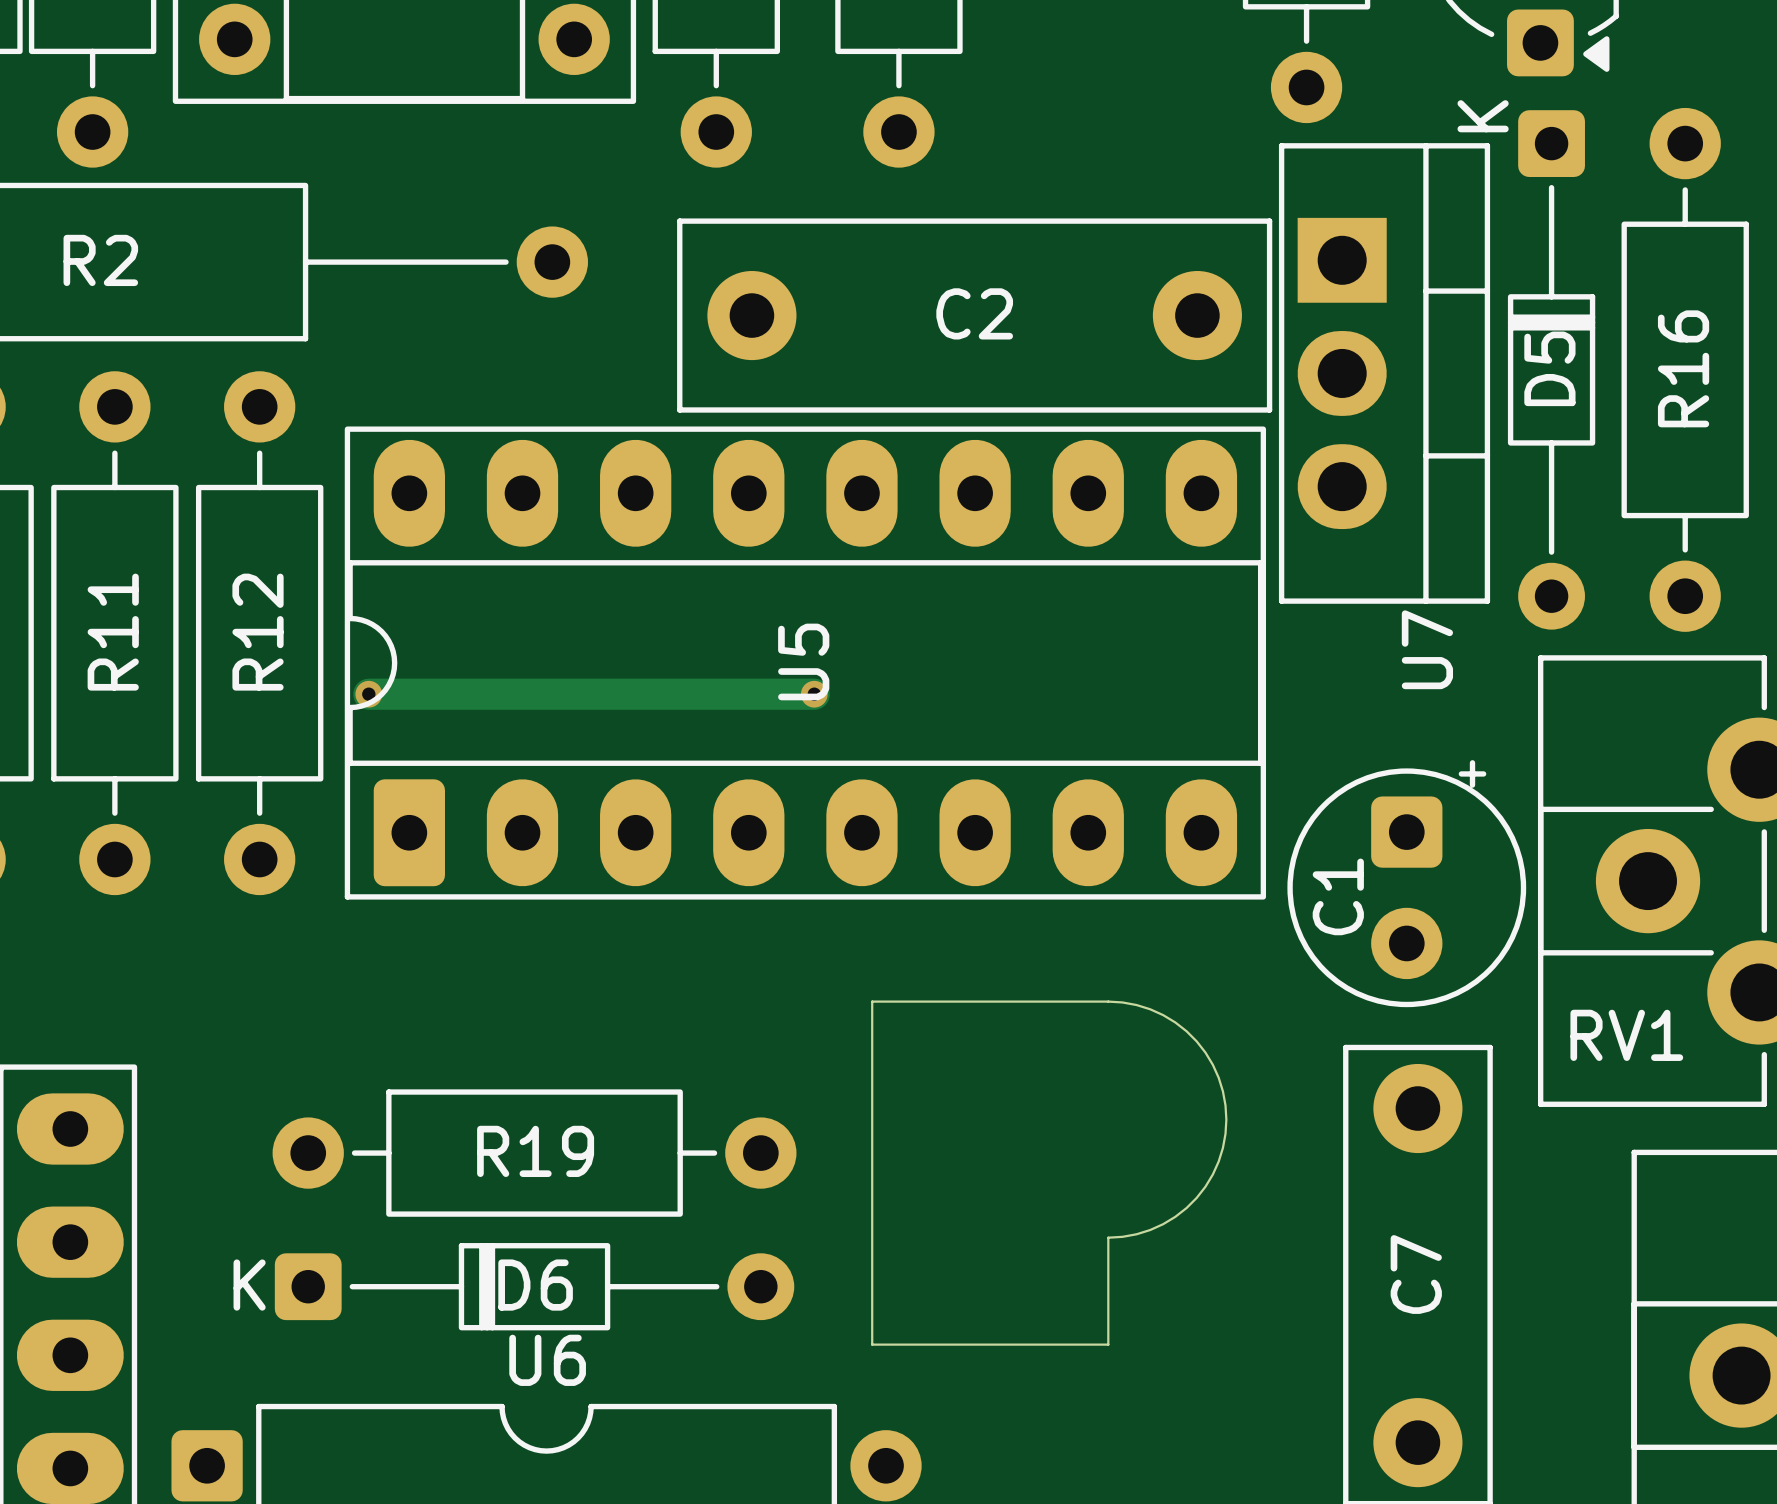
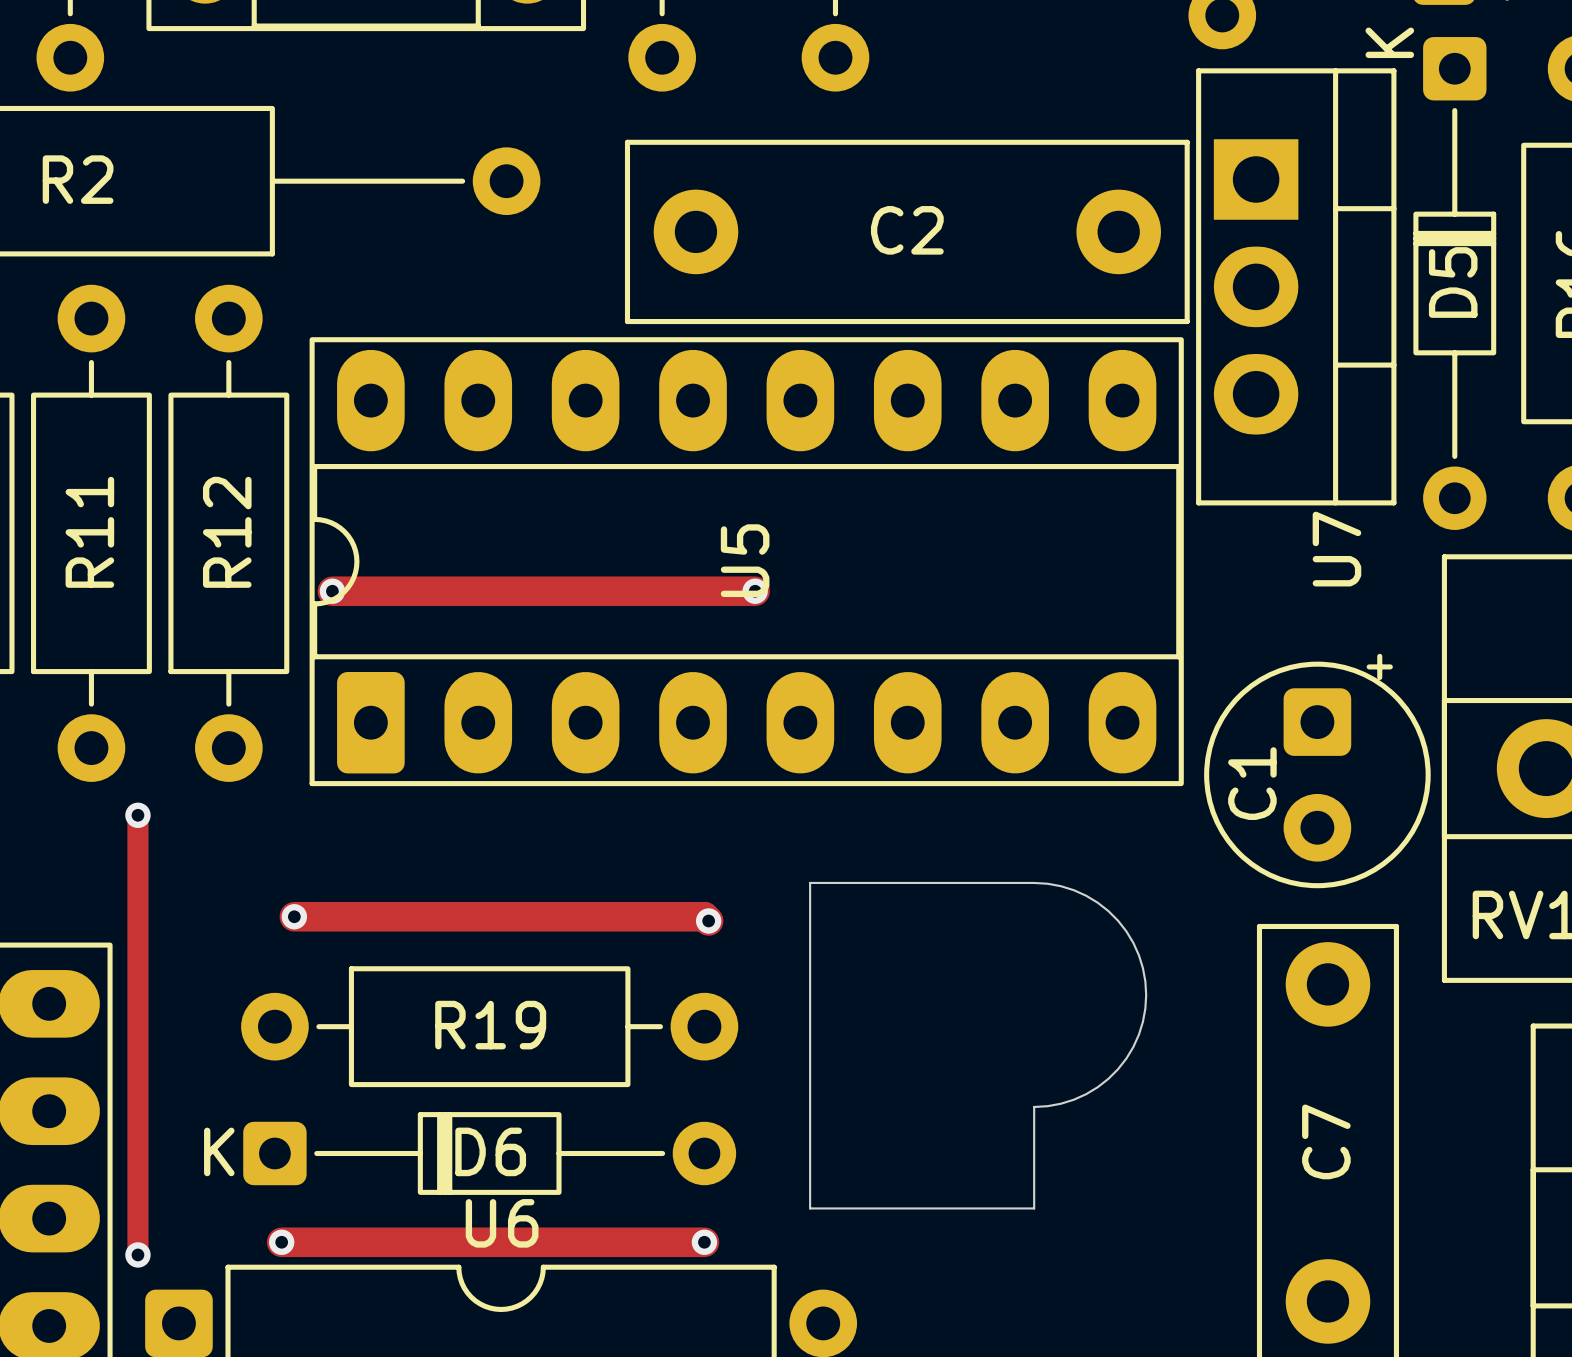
track: none -> (137, 815) (137, 1254)
via: none -> (137, 815)
track: none -> (294, 916) (704, 916) (708, 920)
via: none -> (294, 916)
via: none -> (708, 920)
track: none -> (281, 1242) (704, 1242)
via: none -> (281, 1242)
via: none -> (704, 1242)
via: none -> (137, 1254)

